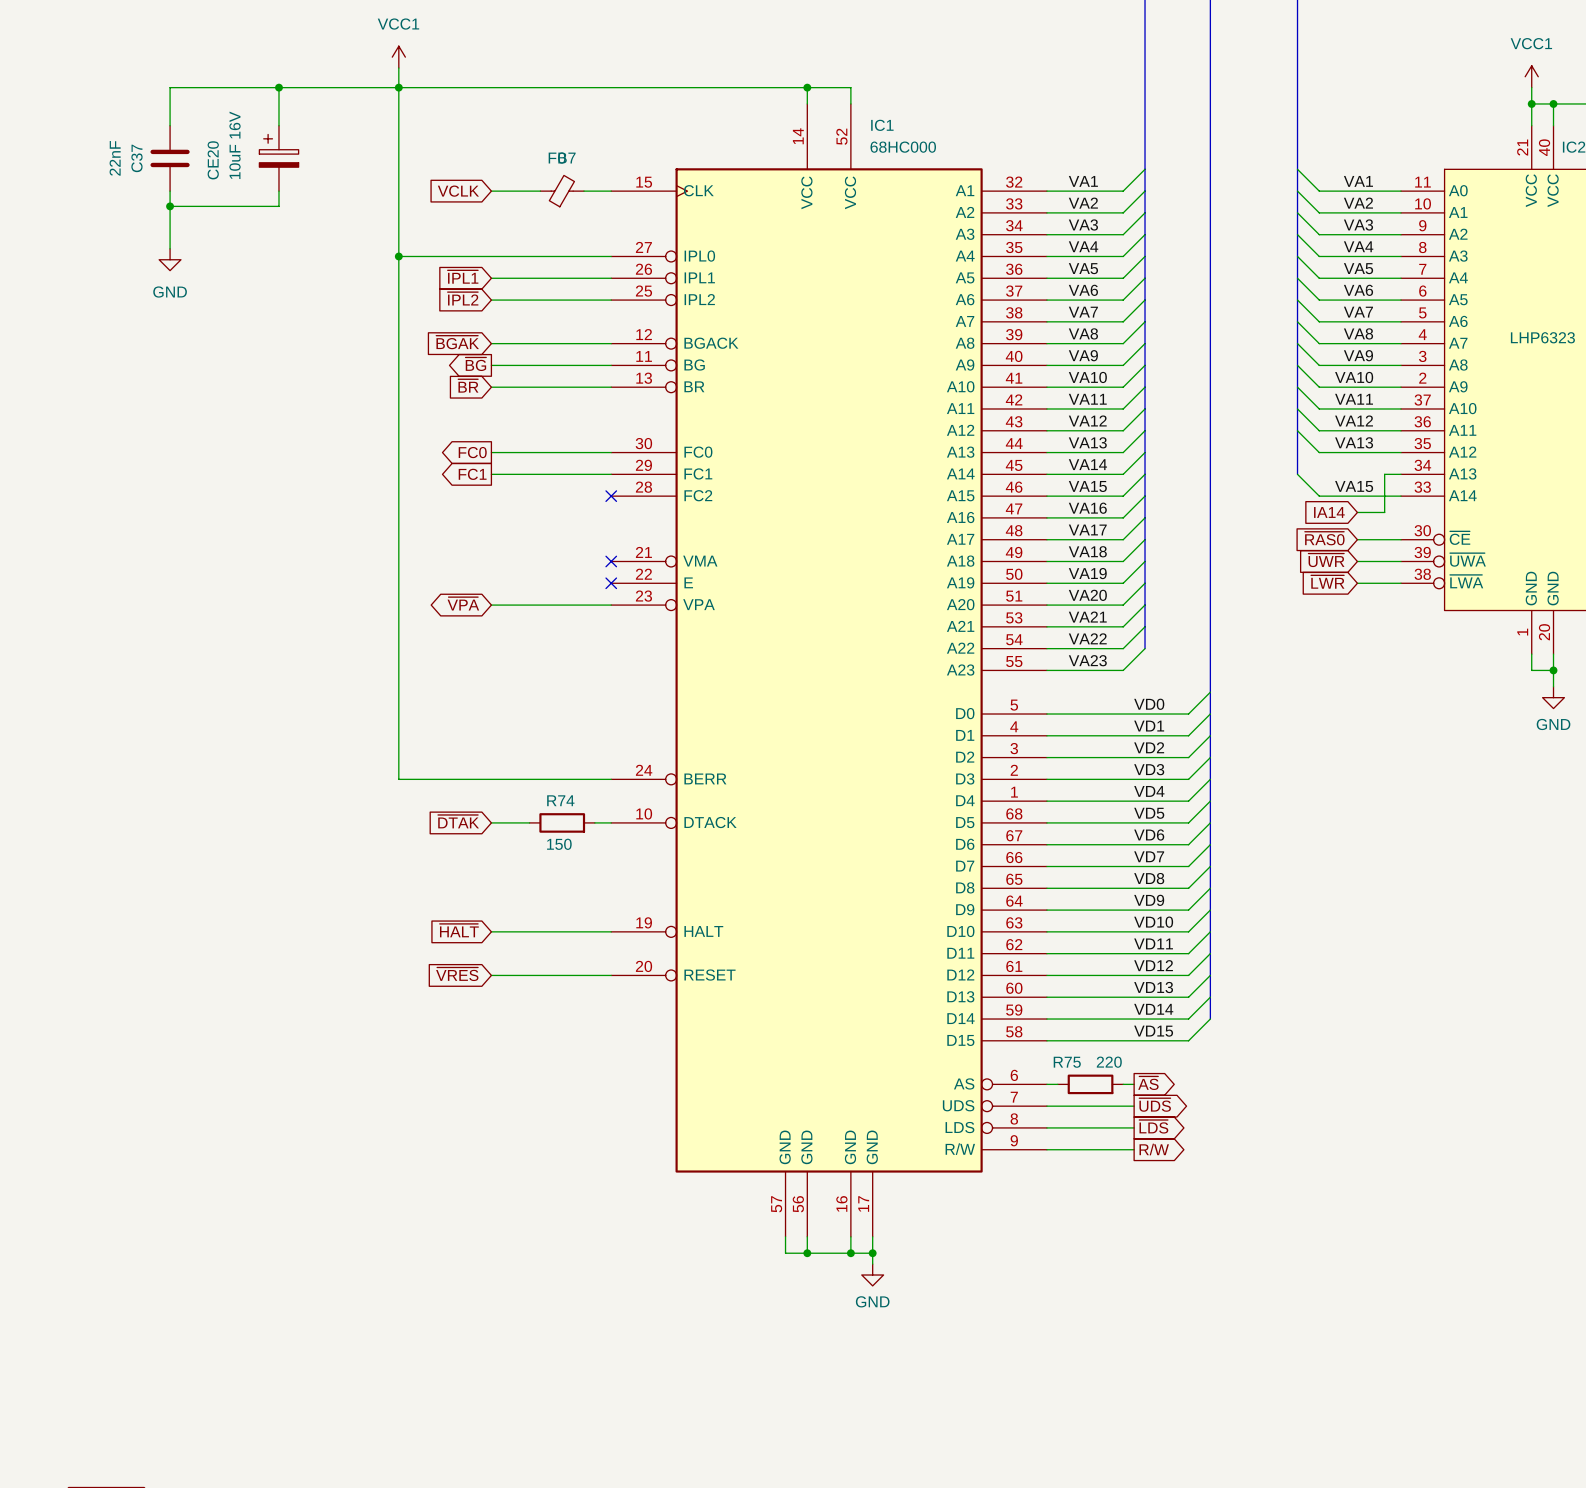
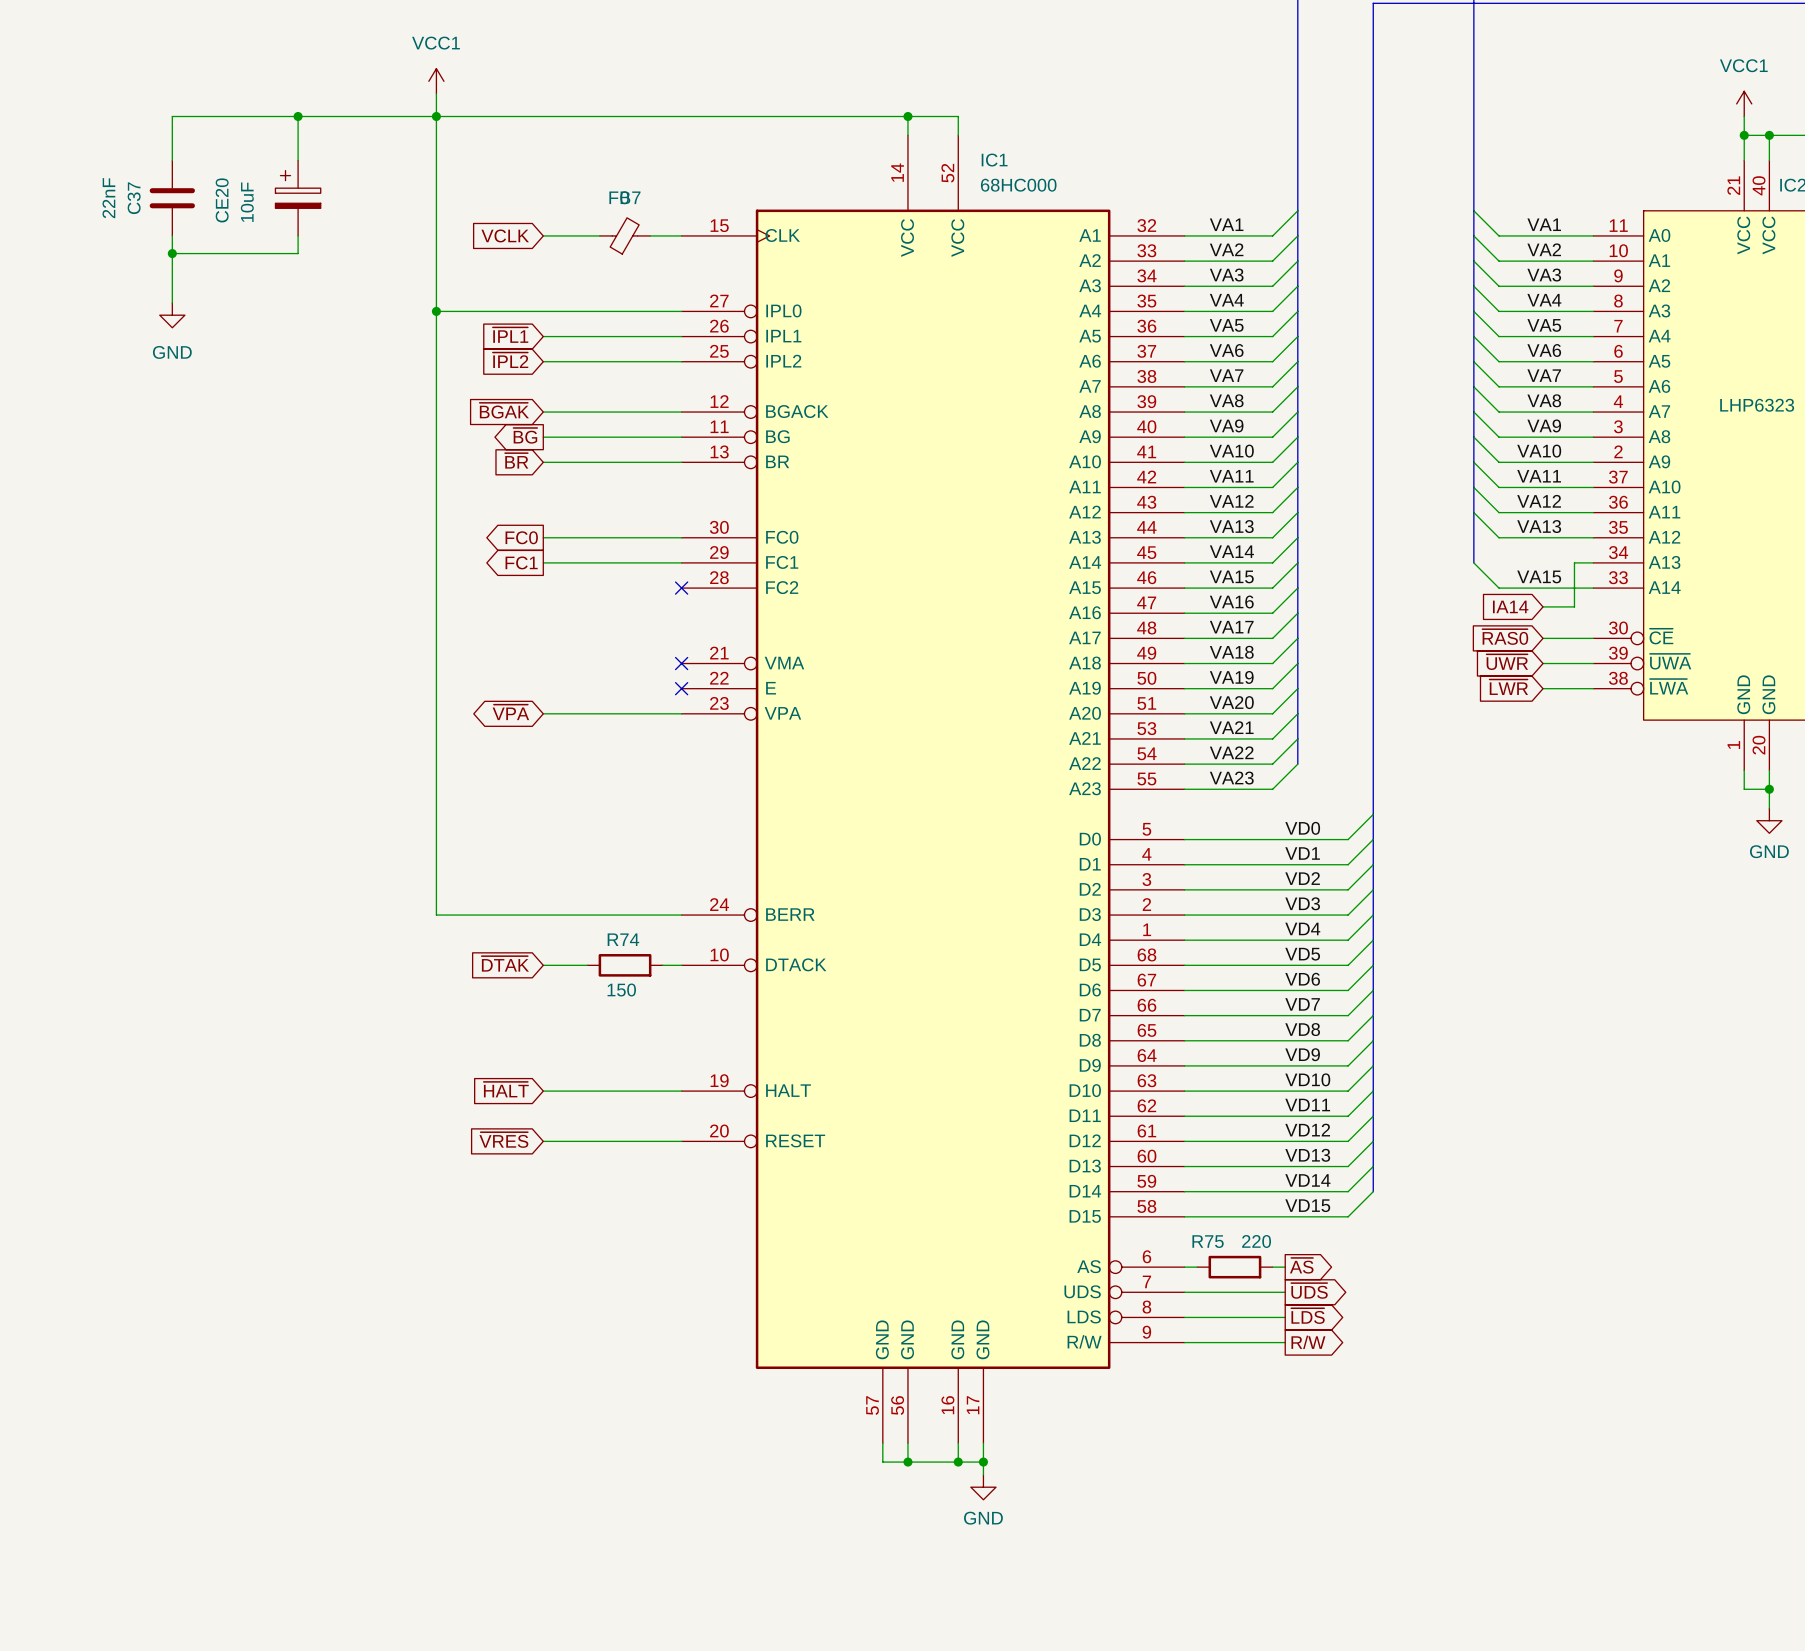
CE20 value: 10uF 16V (235, 145) -> 10uF (247, 202)

